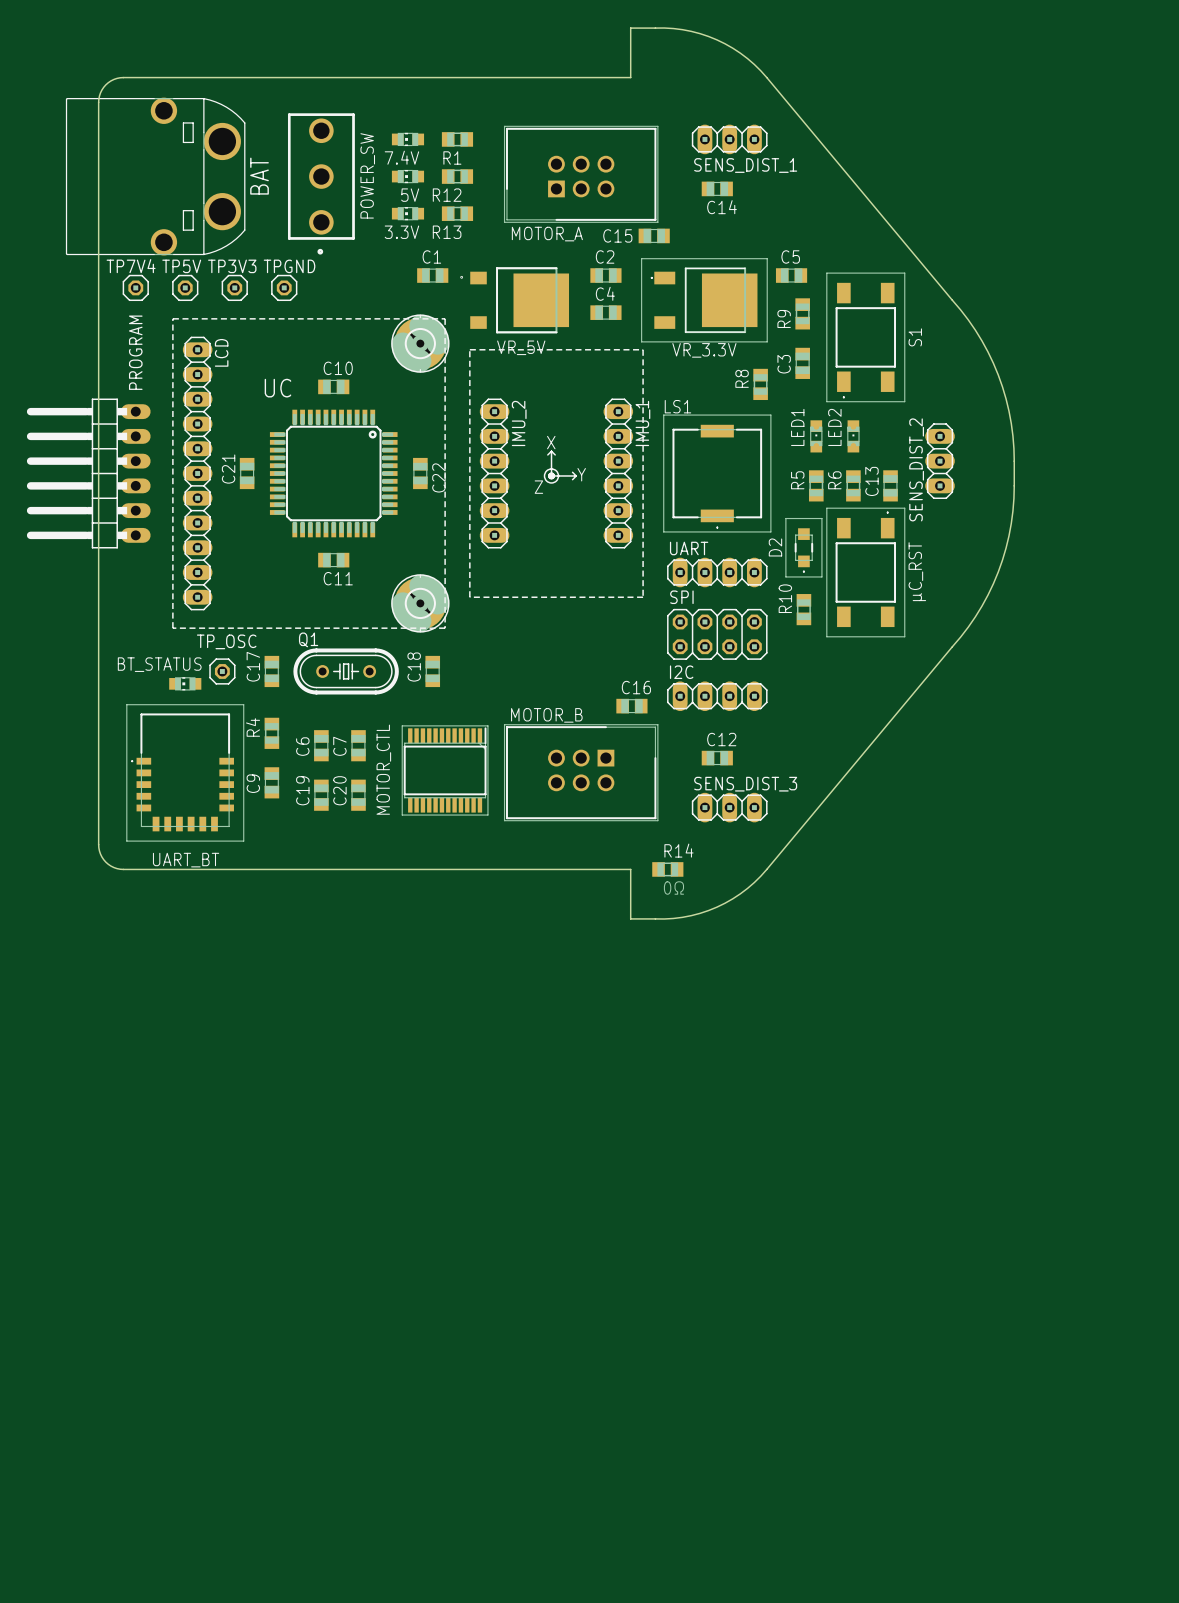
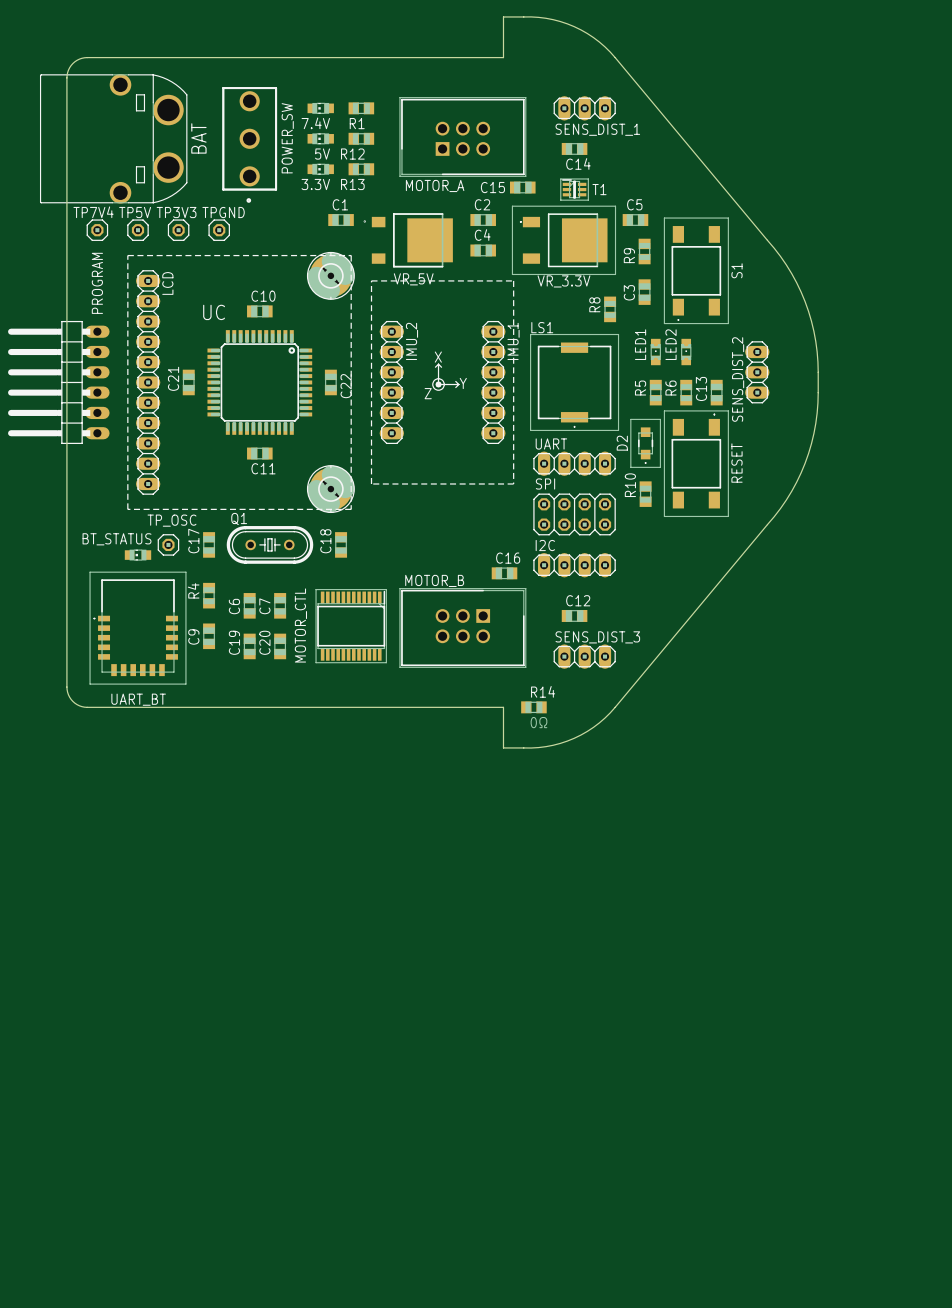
T1: none -> (574, 189)
µC_RST name: µC_RST (917, 571) -> RESET (737, 463)

